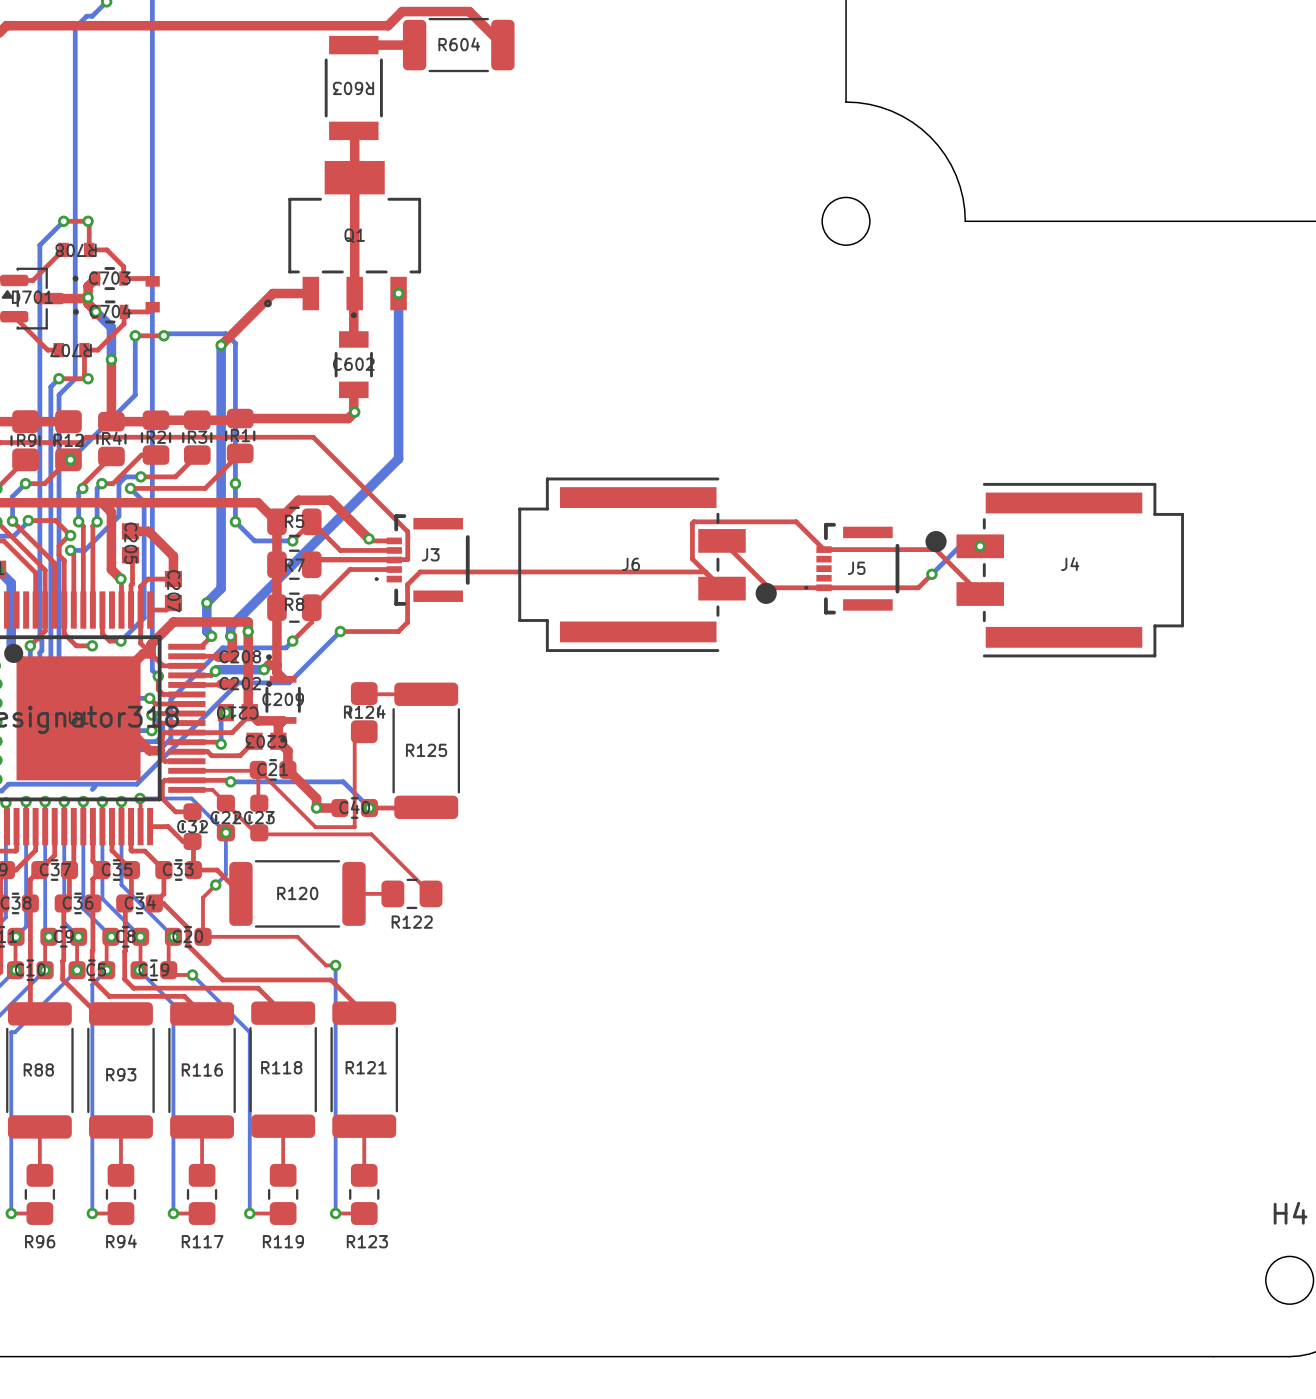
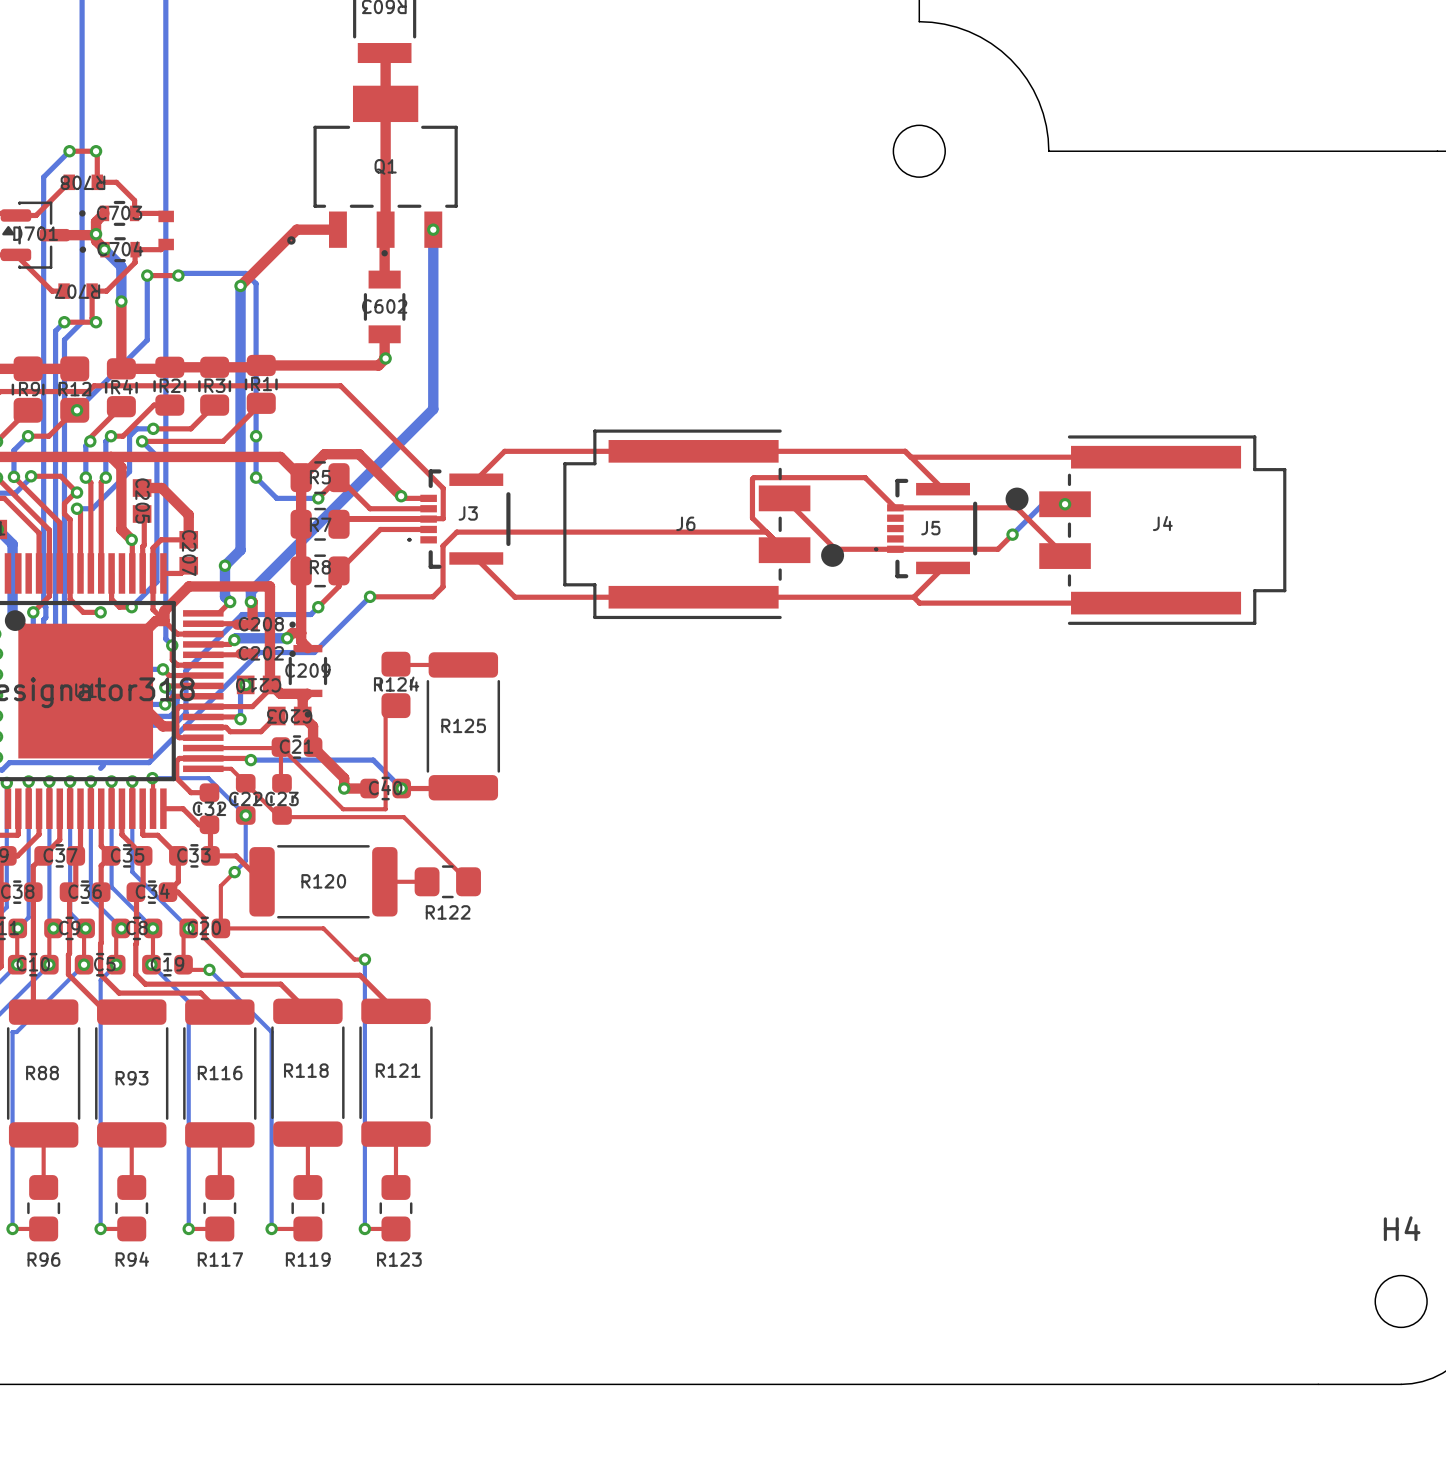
top track: none -> (911, 457) (1156, 457)
top track: none -> (476, 479) (504, 451) (905, 451) (943, 489)
top track: none -> (476, 558) (515, 597) (913, 597)
top track: none -> (943, 567) (913, 597)
via: (248, 631) -> none
top track: none -> (913, 597) (919, 603) (1156, 603)

